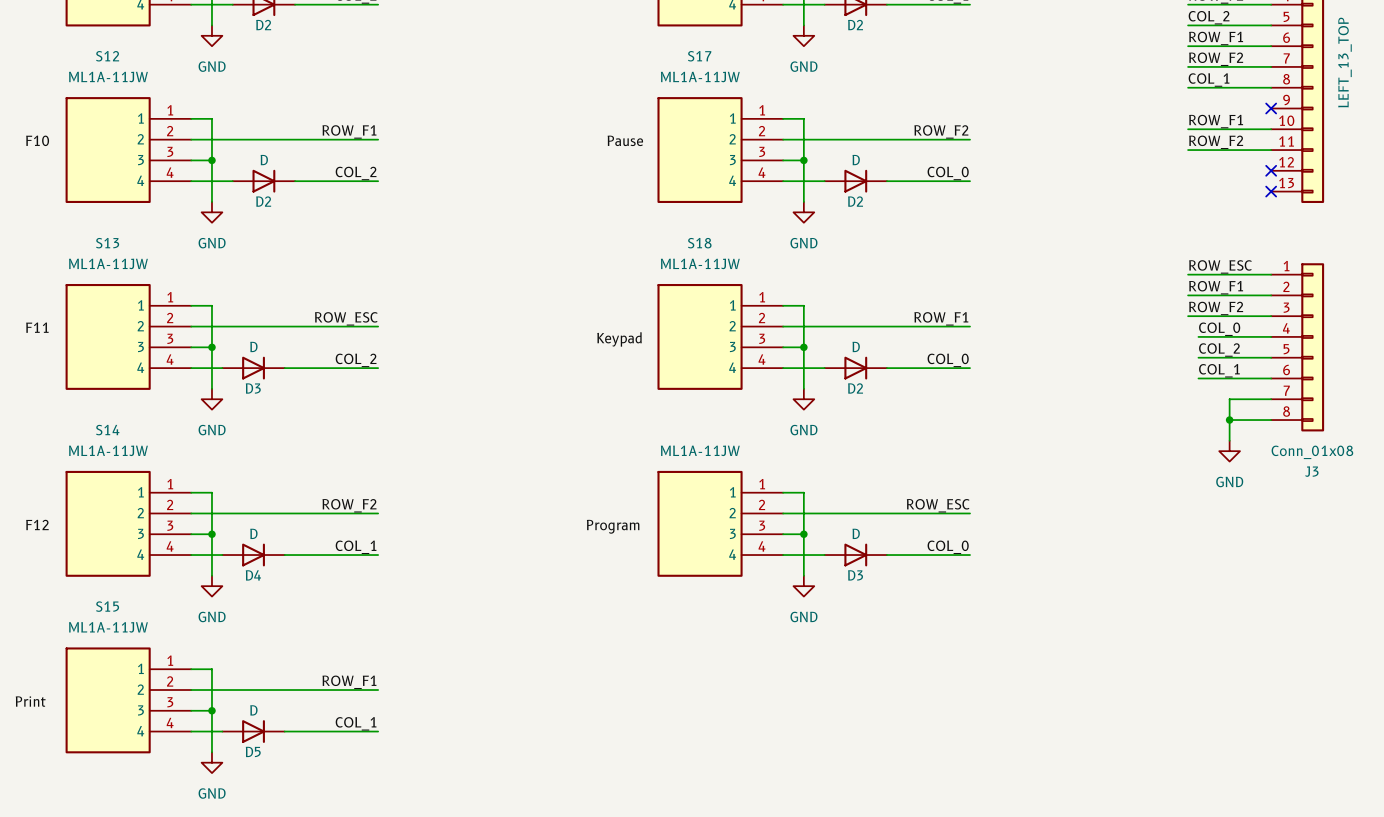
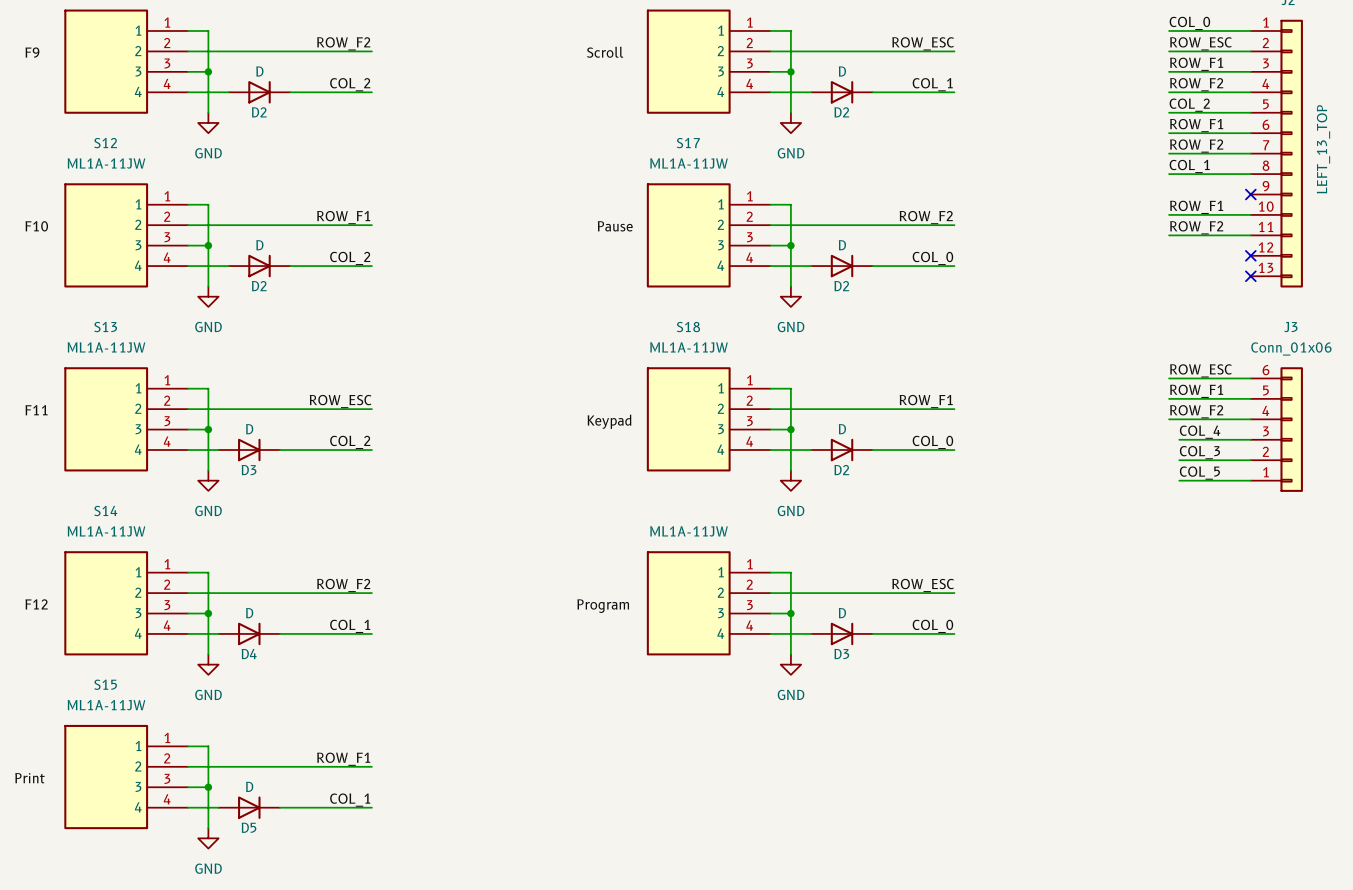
J3 symbol: [1271, 263, 1325, 432] -> [1250, 367, 1303, 492]
label: ROW_ESC (1220, 266) -> none
wire: (1188, 274) (1271, 274) -> none
label: ROW_F1 (1216, 287) -> ROW_ESC (1200, 370)
label: ROW_F2 (1216, 308) -> ROW_F1 (1196, 391)
label: none -> ROW_F2 (1196, 411)
label: COL_0 (1219, 329) -> none
wire: none -> (1169, 419) (1179, 419)
label: COL_2 (1219, 350) -> COL_4 (1200, 432)
label: COL_1 (1219, 370) -> COL_3 (1199, 452)
label: none -> COL_5 (1199, 473)
wire: (1229, 399) (1229, 440) -> (1209, 480) (1179, 480)
wire: (1229, 420) (1271, 420) -> none
junction: (1229, 420) -> none
power symbol: GND (1229, 451) -> none
J3 value: Conn_01x08 (1312, 452) -> Conn_01x06 (1291, 348)
J3 name position: J3 (1311, 471) -> J3 (1290, 327)

